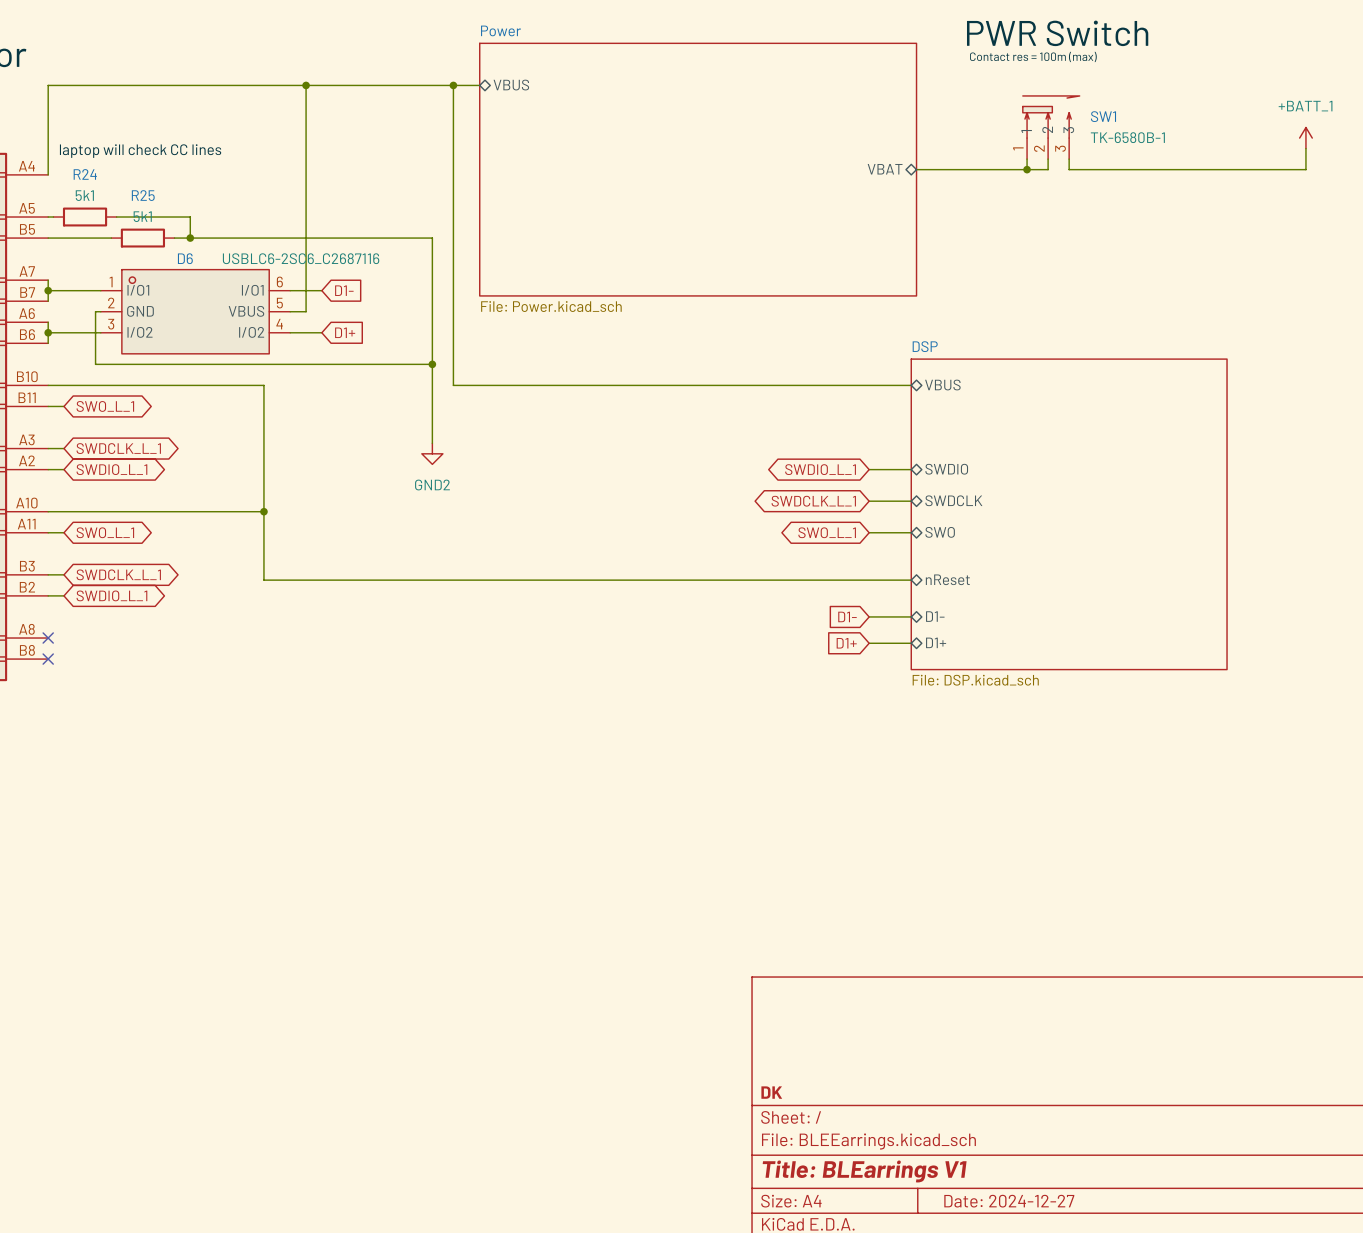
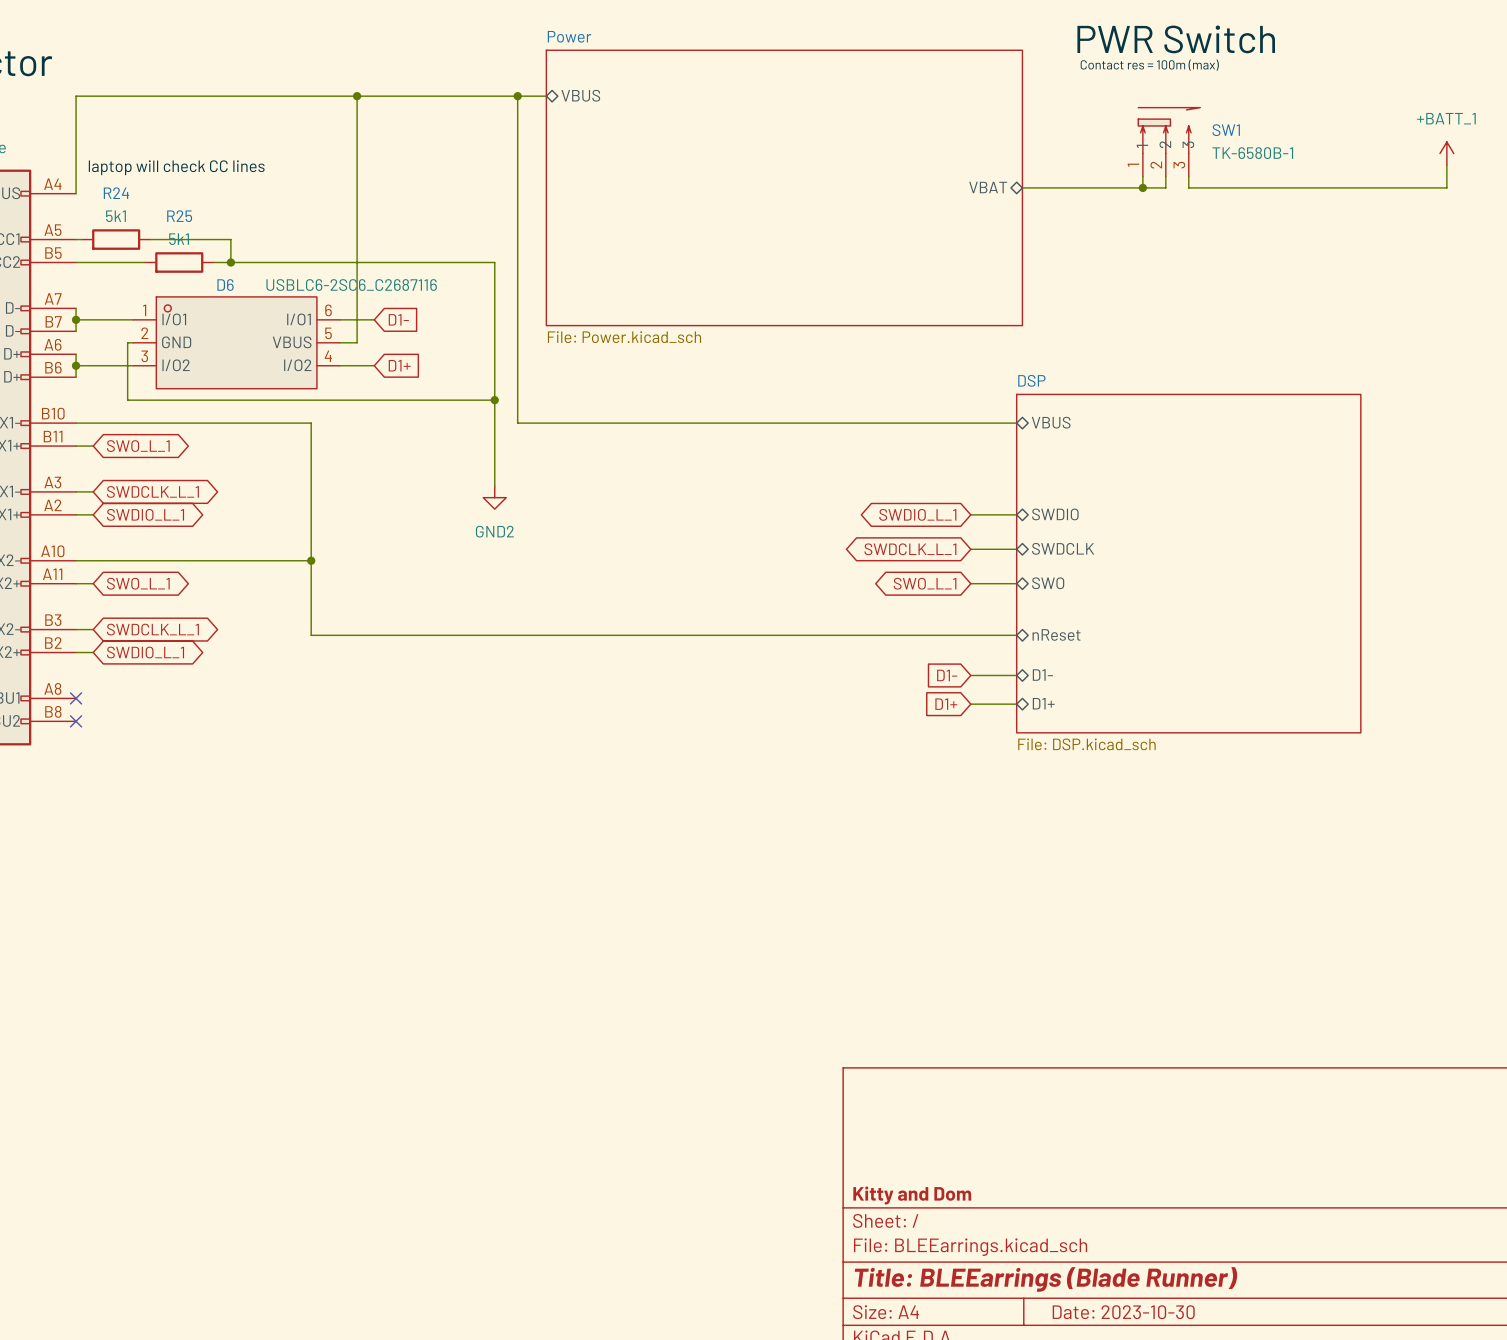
title block: DK (771, 1092) -> Kitty and Dom (912, 1195)
title block: Title: BLEarrings V1 (864, 1171) -> Title: BLEEarrings (Blade Runner) (1046, 1279)
title block: Date: 2024-12-27 (1009, 1201) -> Date: 2023-10-30 (1123, 1312)

